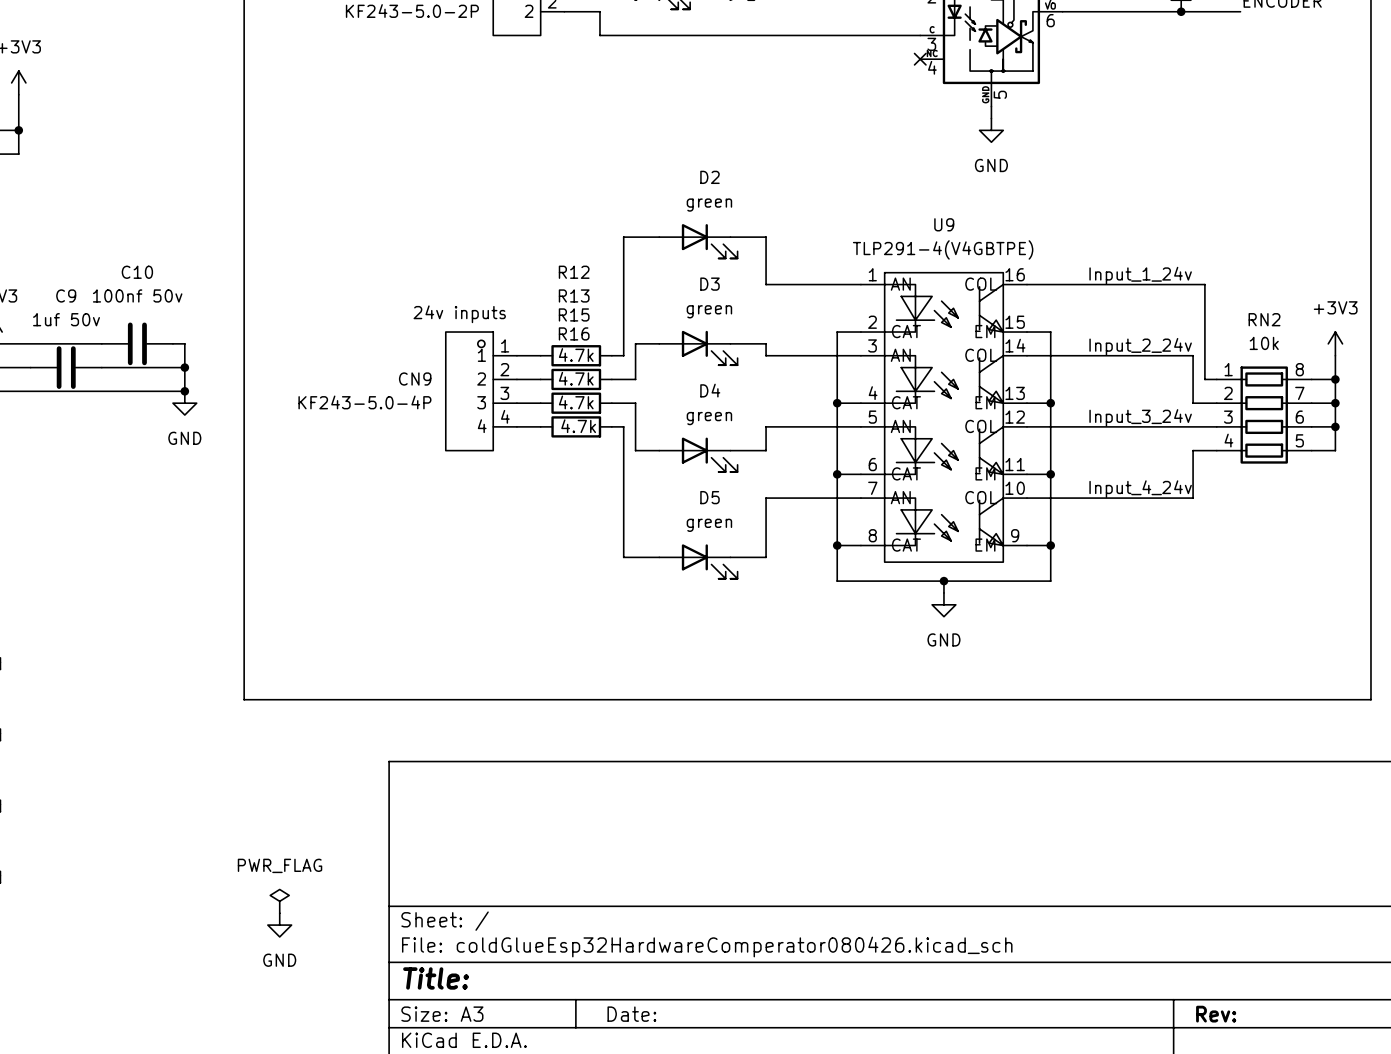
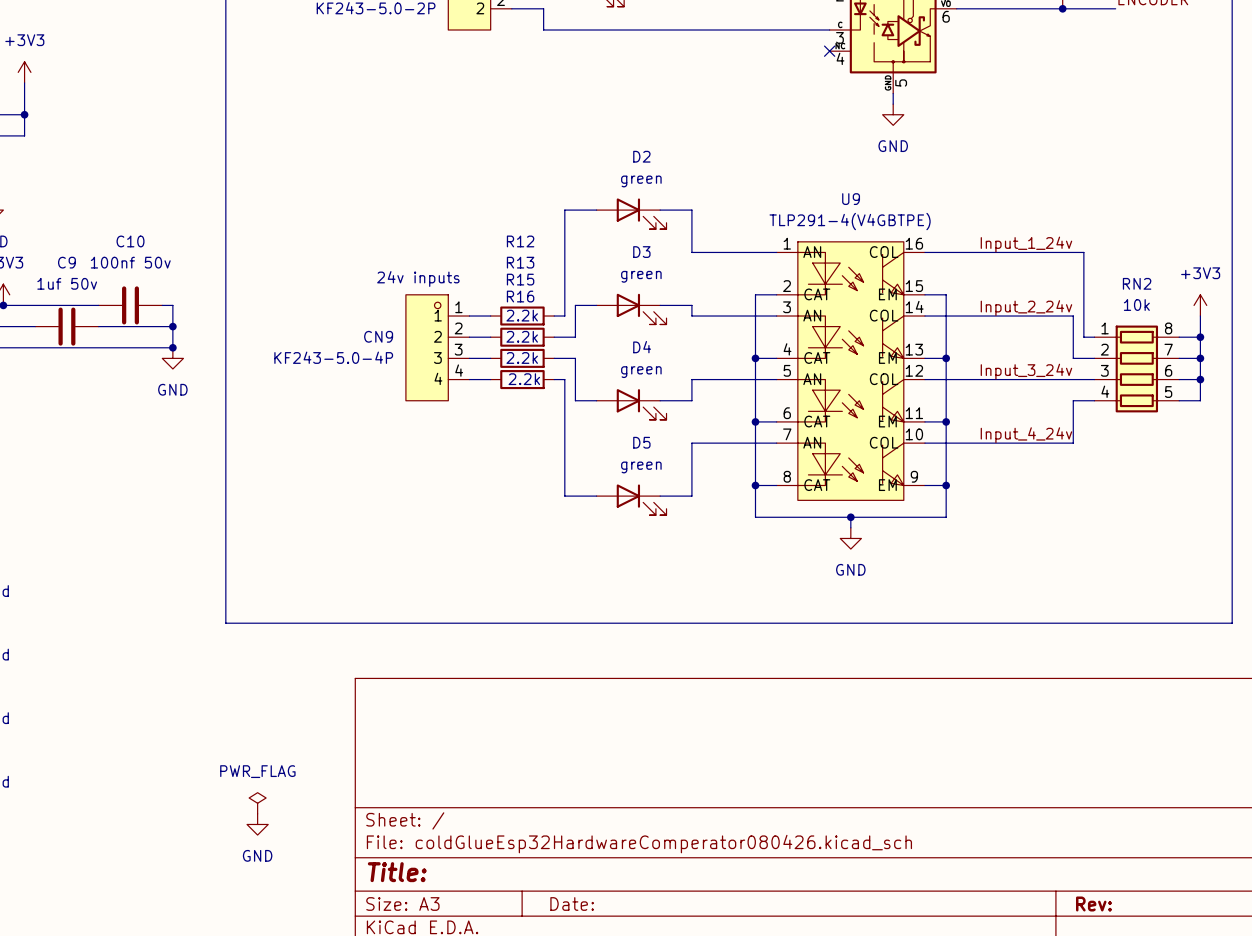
R12 value: 4.7k (576, 355) -> 2.2k (522, 315)
R13 value: 4.7k (576, 378) -> 2.2k (522, 336)
R15 value: 4.7k (576, 402) -> 2.2k (522, 357)
R16 value: 4.7k (578, 426) -> 2.2k (524, 379)

